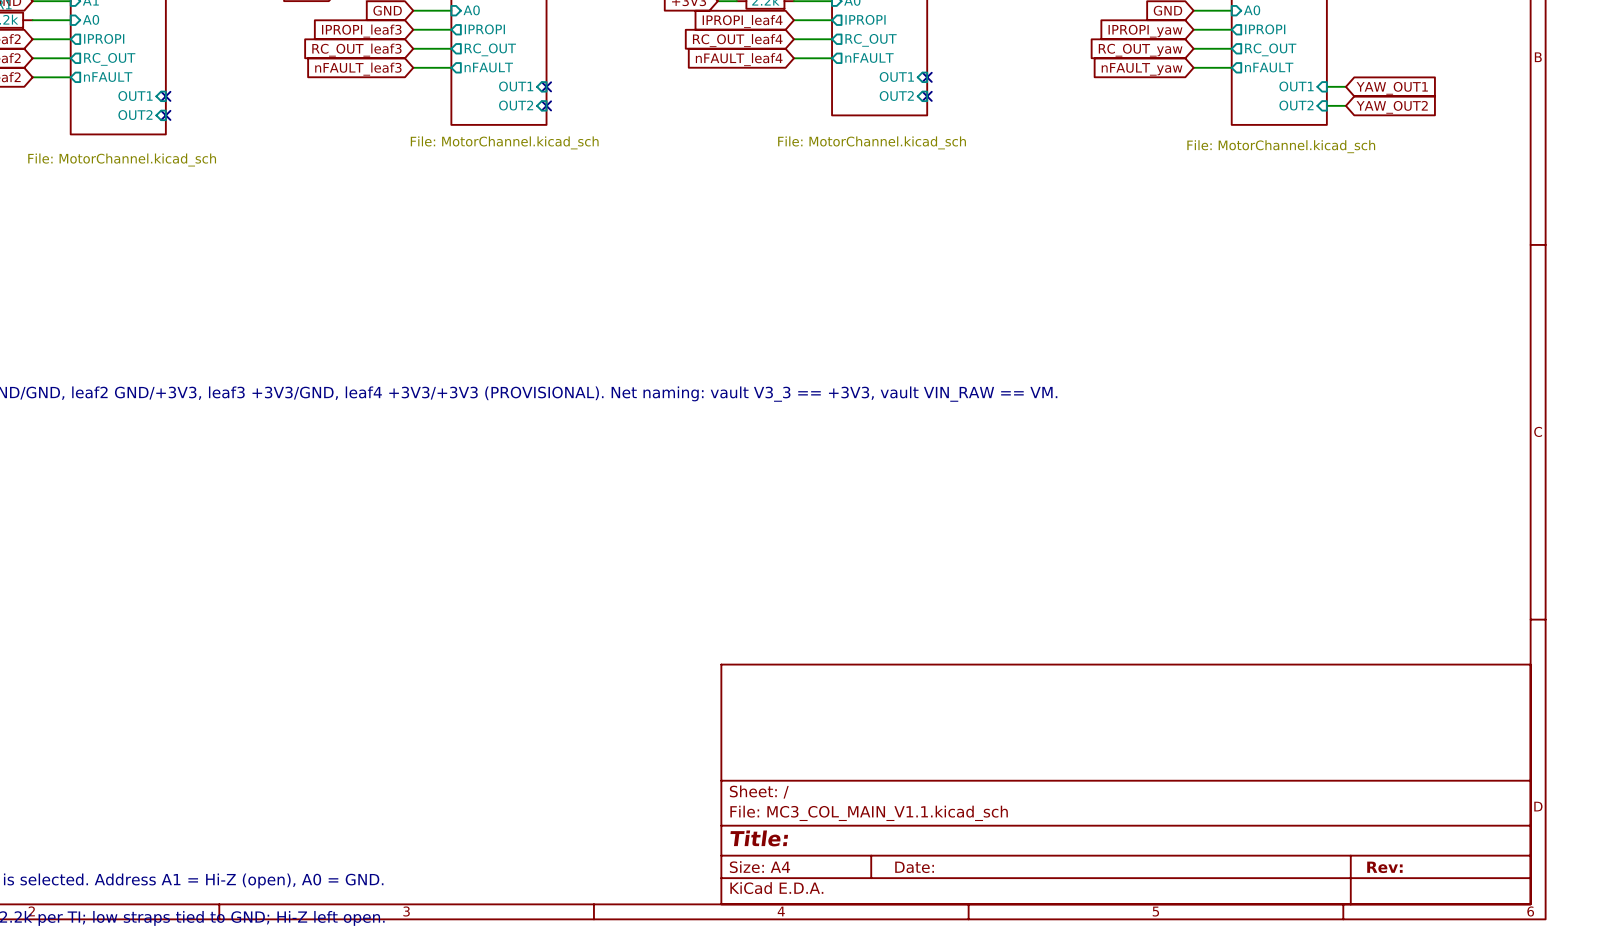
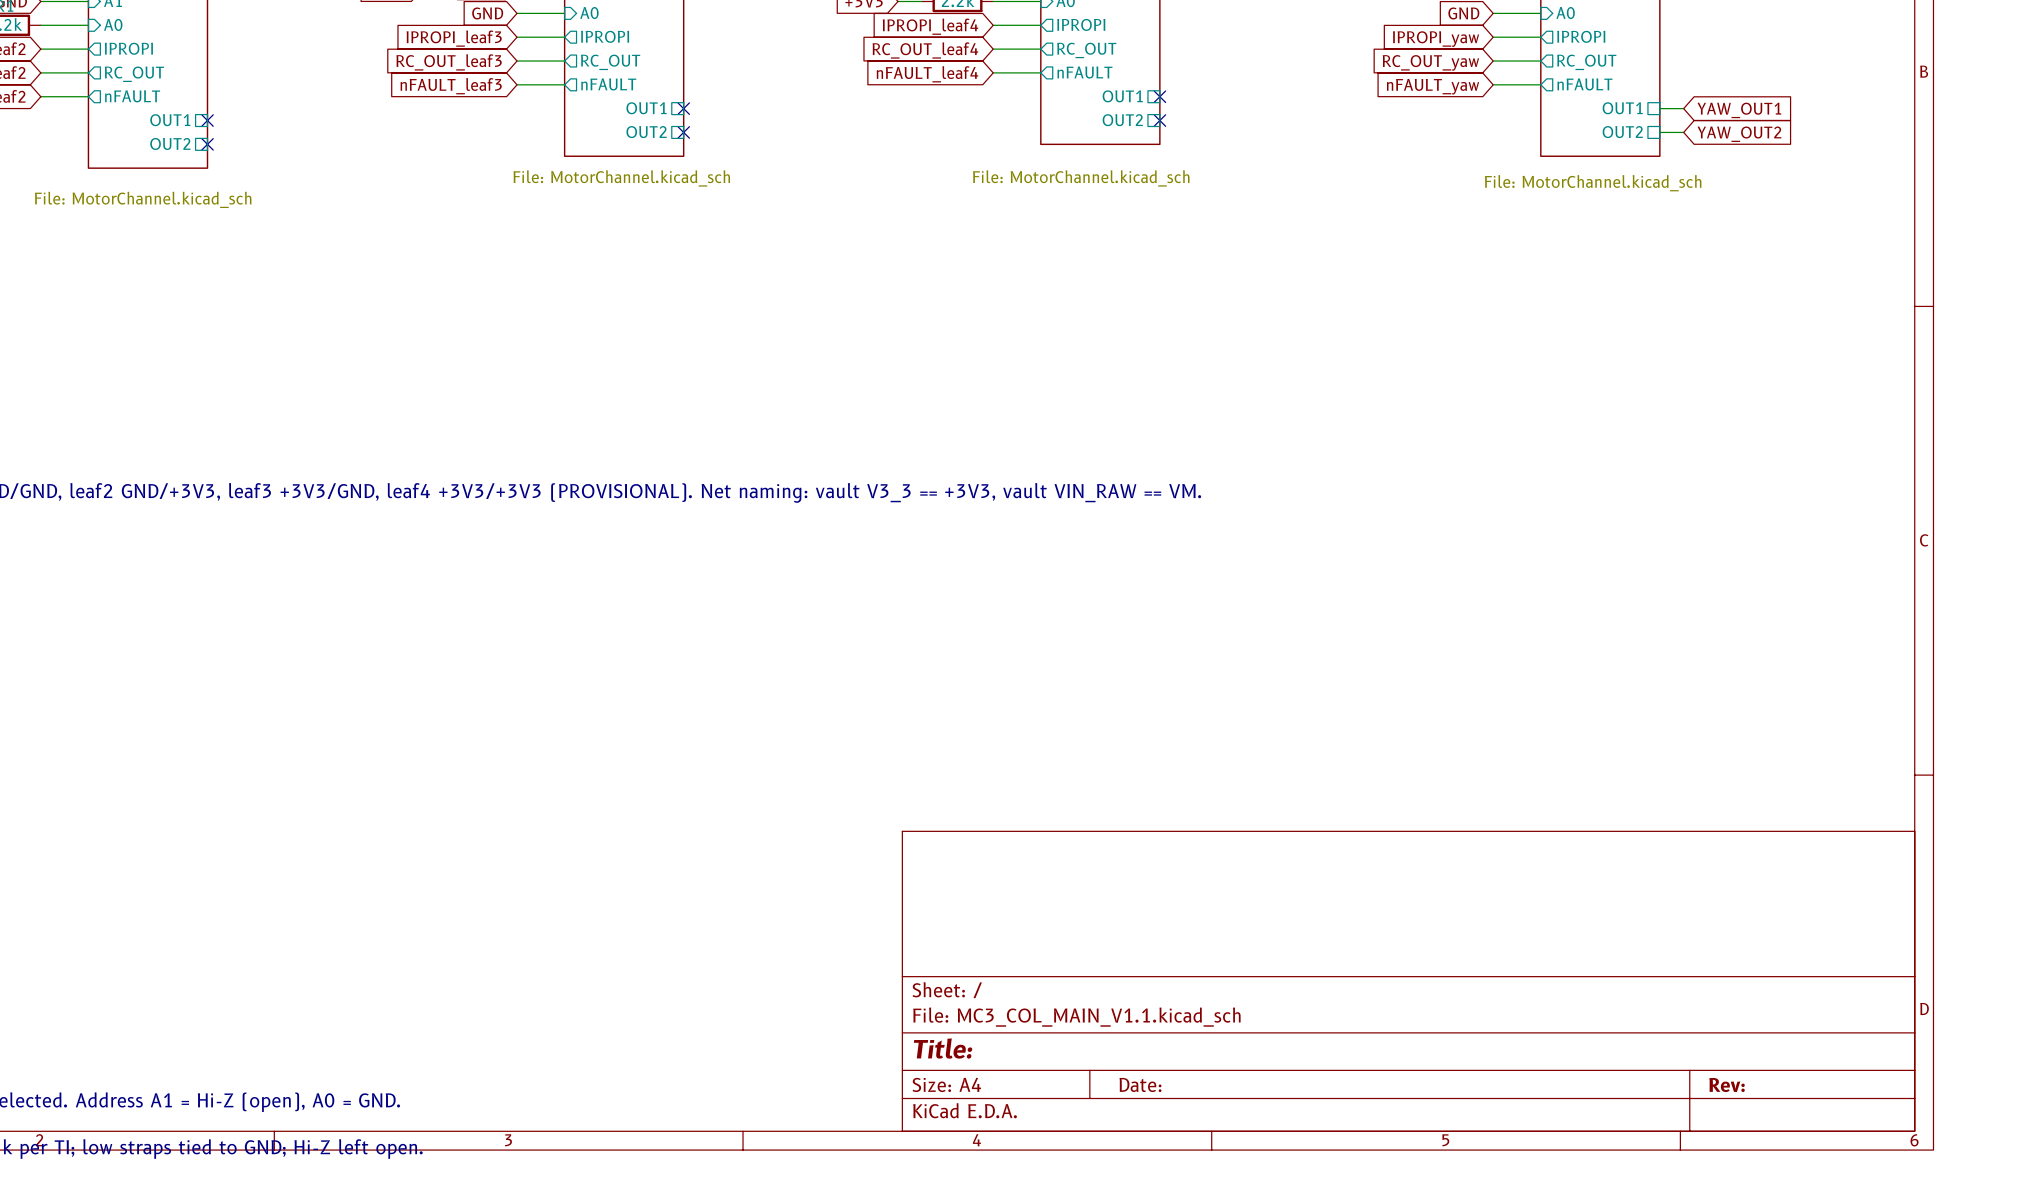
sheet pin shape: input (896, 76) -> passive (1122, 96)
sheet pin shape: input (516, 86) -> passive (646, 108)
sheet pin shape: input (1296, 86) -> passive (1622, 108)
sheet pin shape: input (135, 96) -> passive (170, 120)
sheet pin shape: input (896, 96) -> passive (1122, 120)
sheet pin shape: input (516, 105) -> passive (646, 132)
sheet pin shape: input (1296, 105) -> passive (1622, 132)
sheet pin shape: input (135, 115) -> passive (170, 143)

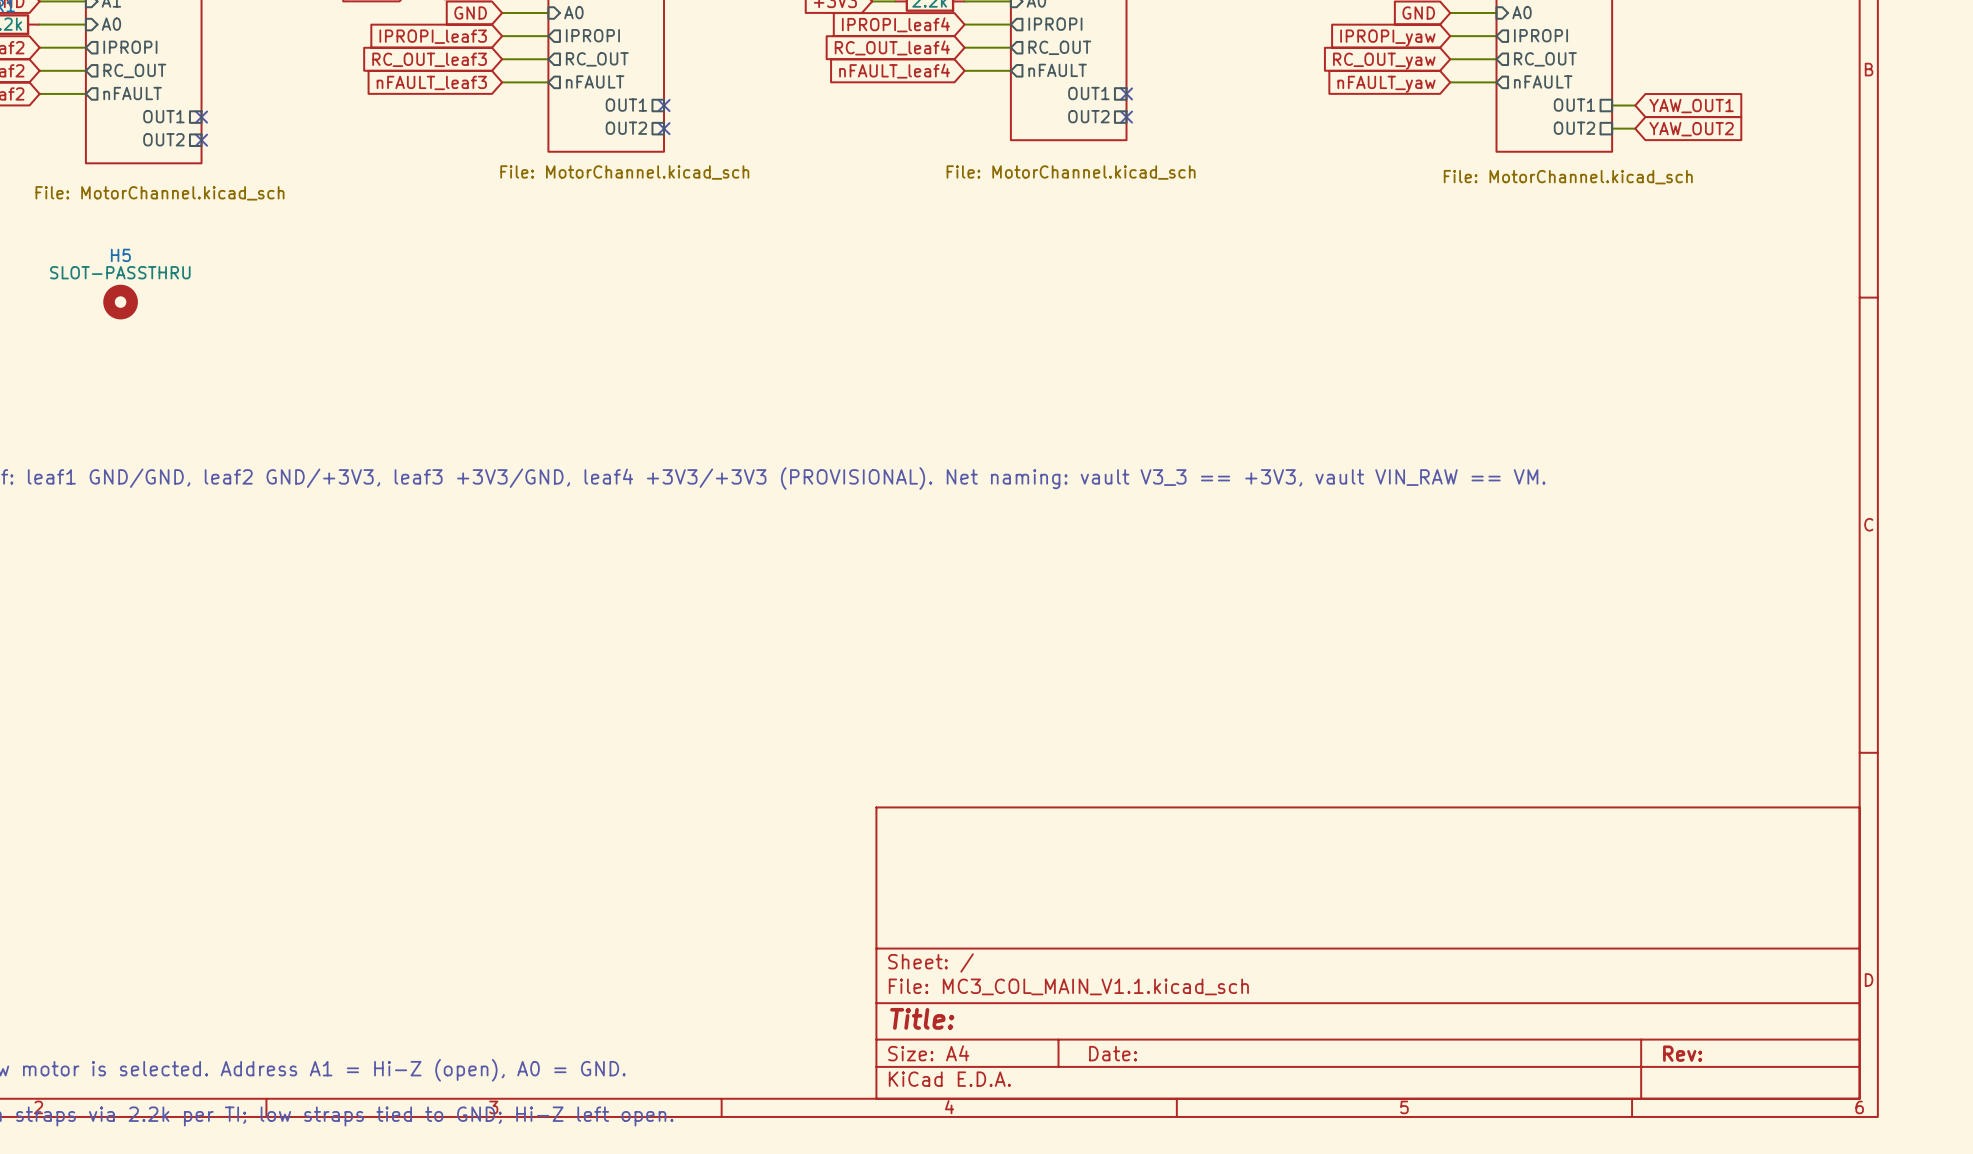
H5: none -> SLOT-PASSTHRU (120, 302)

